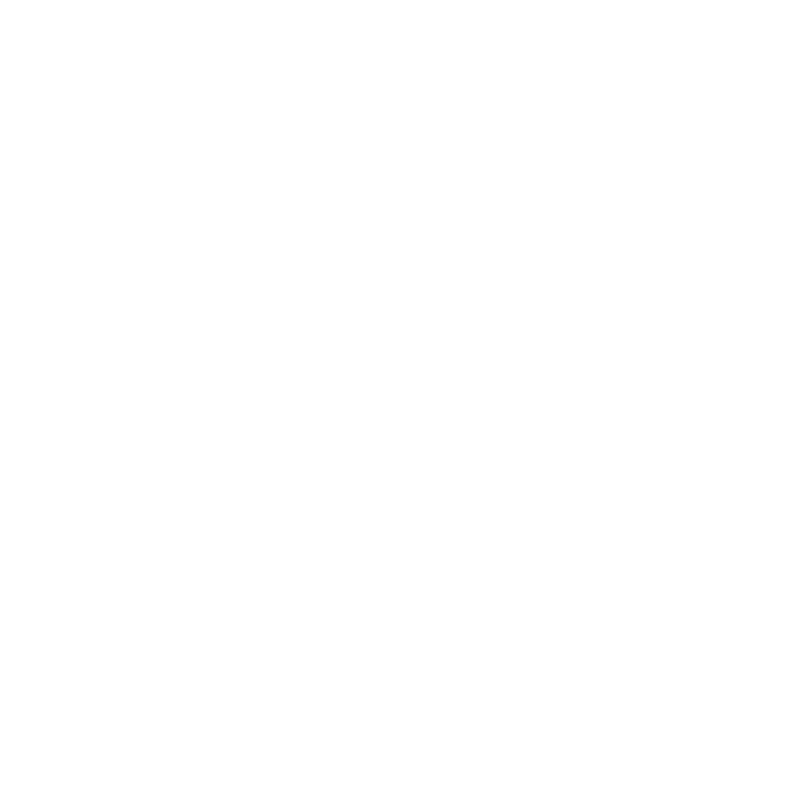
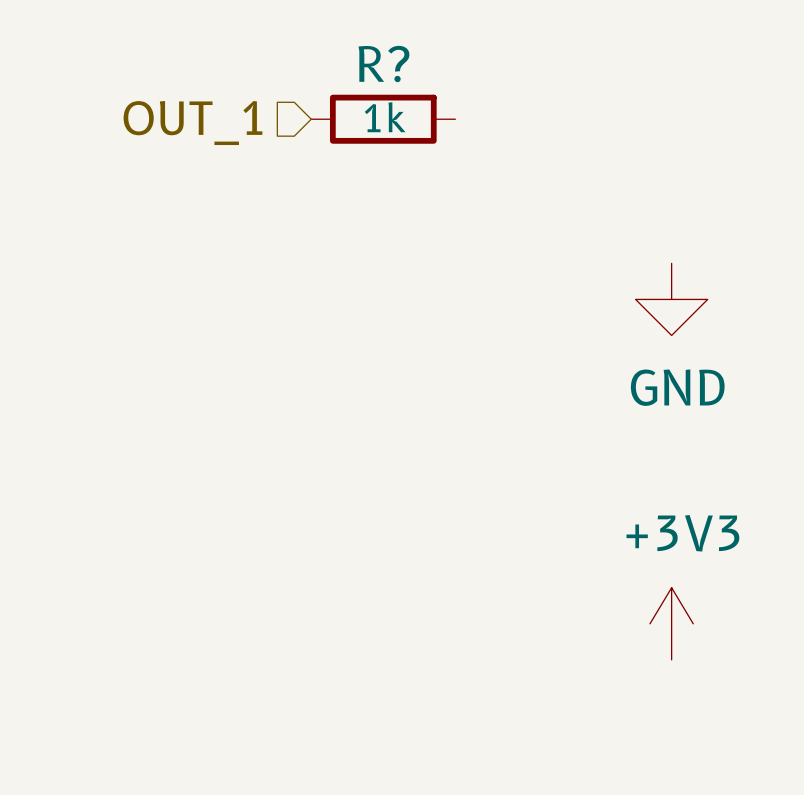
hierarchical label: none -> OUT_1 (192, 123)
R?: none -> 1k (383, 119)
power symbol: none -> GND (671, 299)
power symbol: none -> +3V3 (671, 623)

